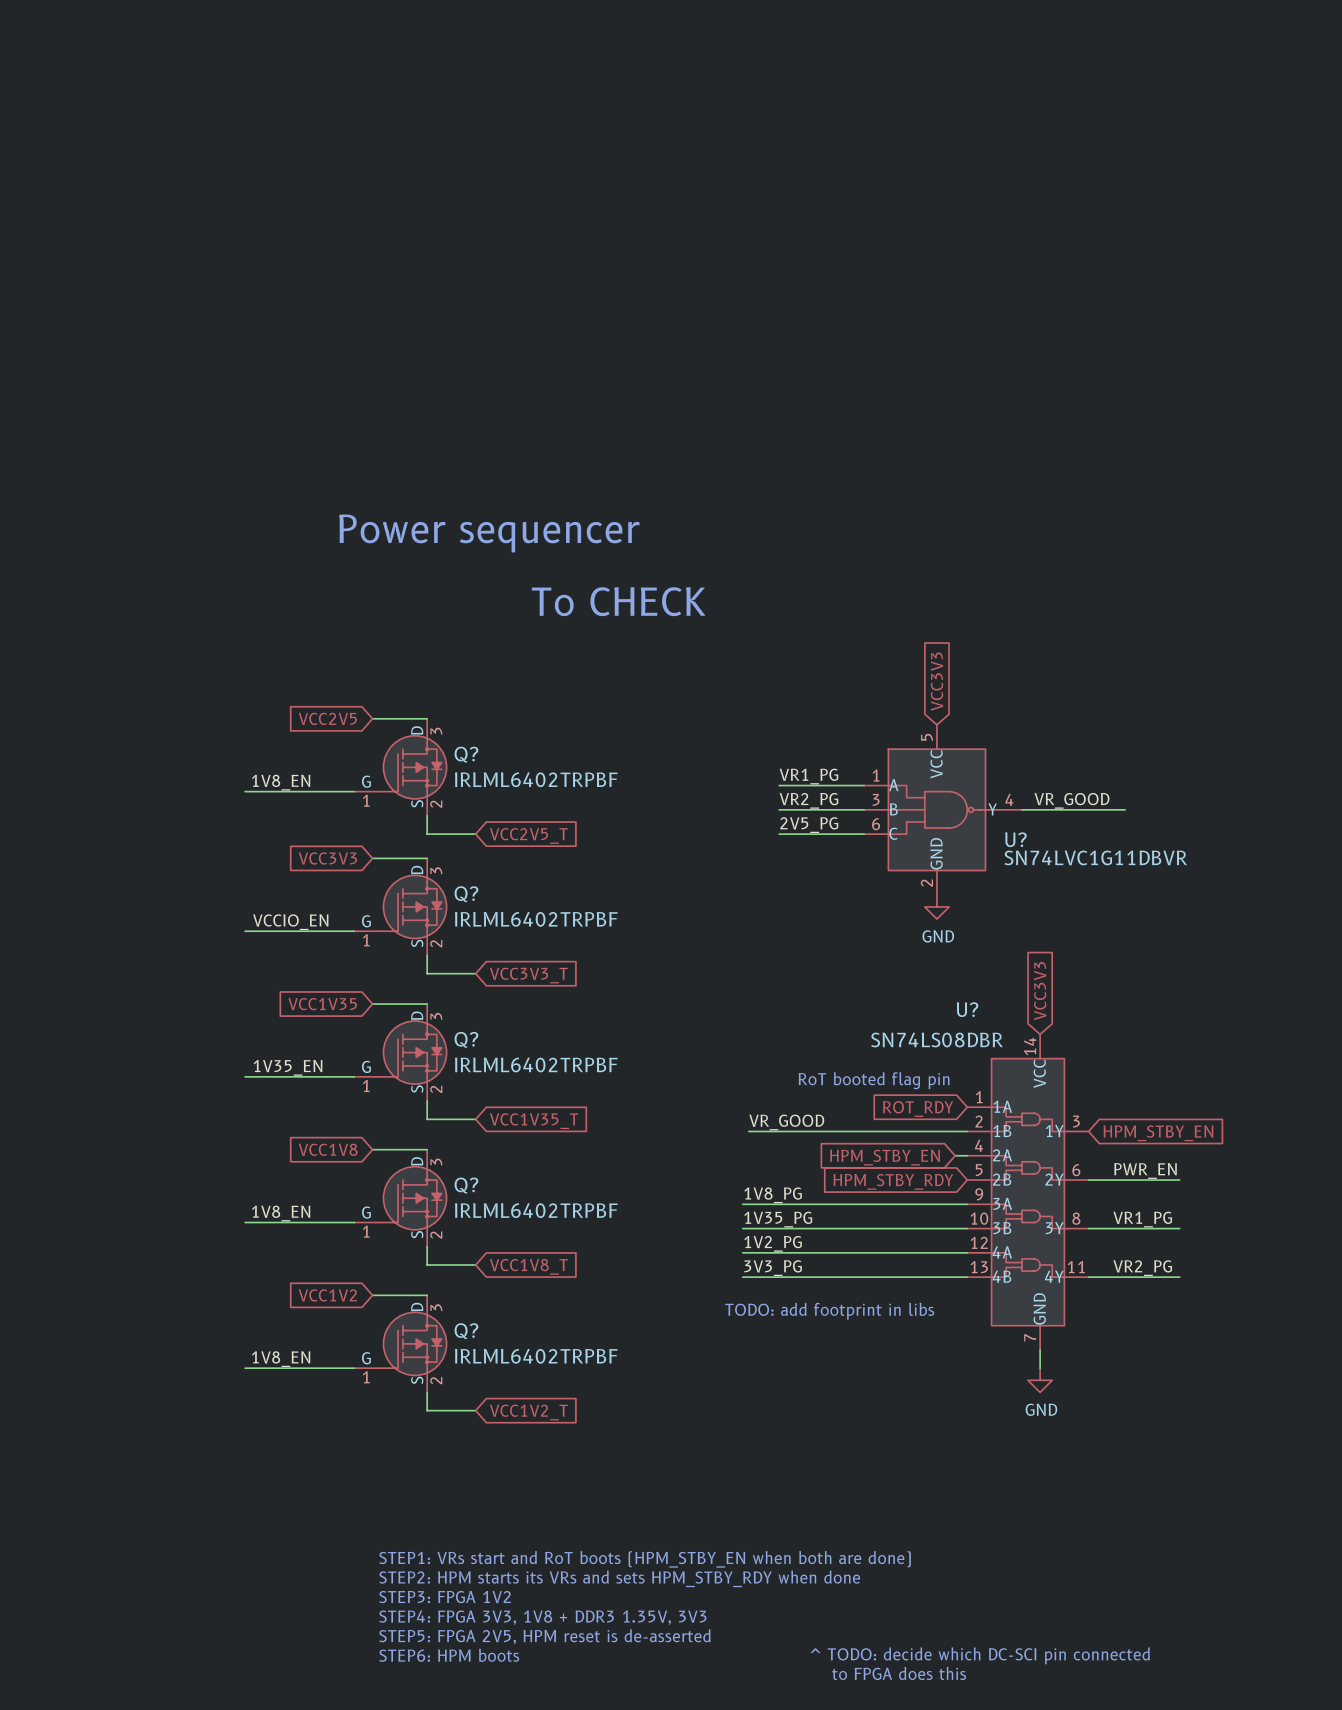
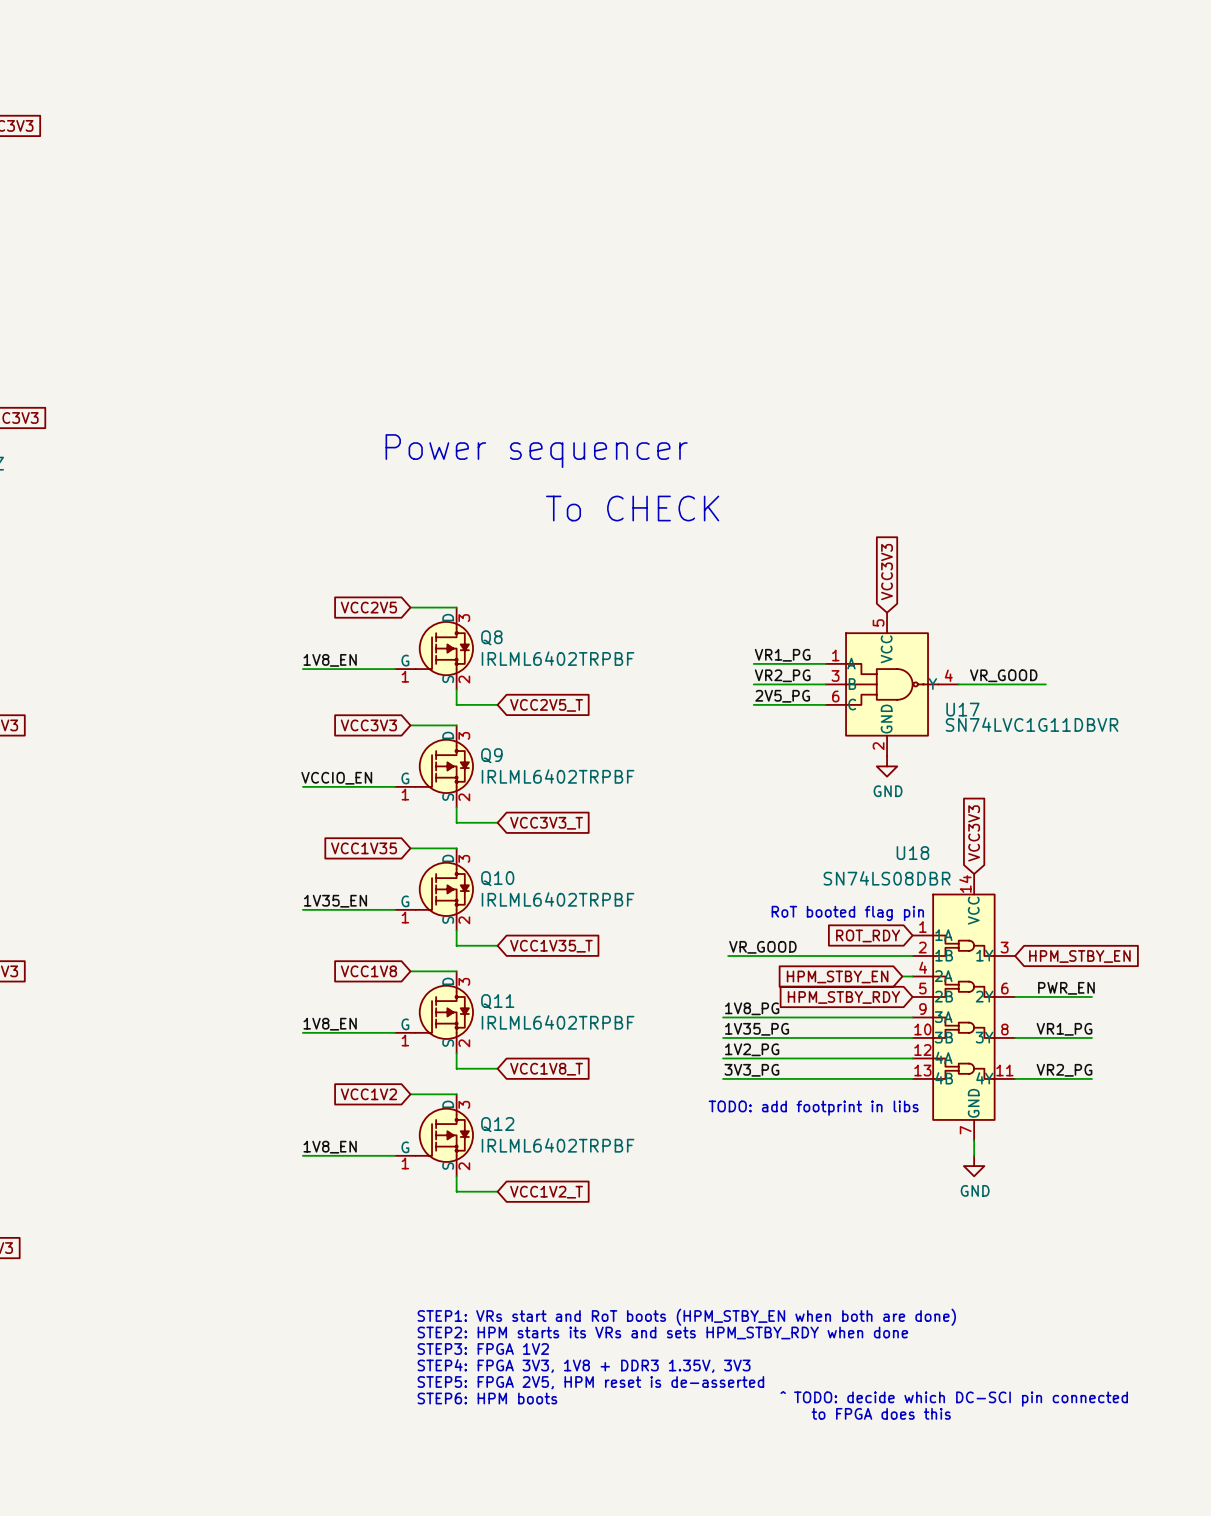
Q? name: Q? (466, 754) -> Q8 (491, 637)
U? name: U? (1015, 839) -> U17 (962, 709)
Q? name: Q? (466, 894) -> Q9 (491, 755)
U? name: U? (967, 1009) -> U18 (912, 853)
Q? name: Q? (466, 1039) -> Q10 (497, 878)
Q? name: Q? (466, 1185) -> Q11 (497, 1001)
Q? name: Q? (466, 1331) -> Q12 (497, 1124)

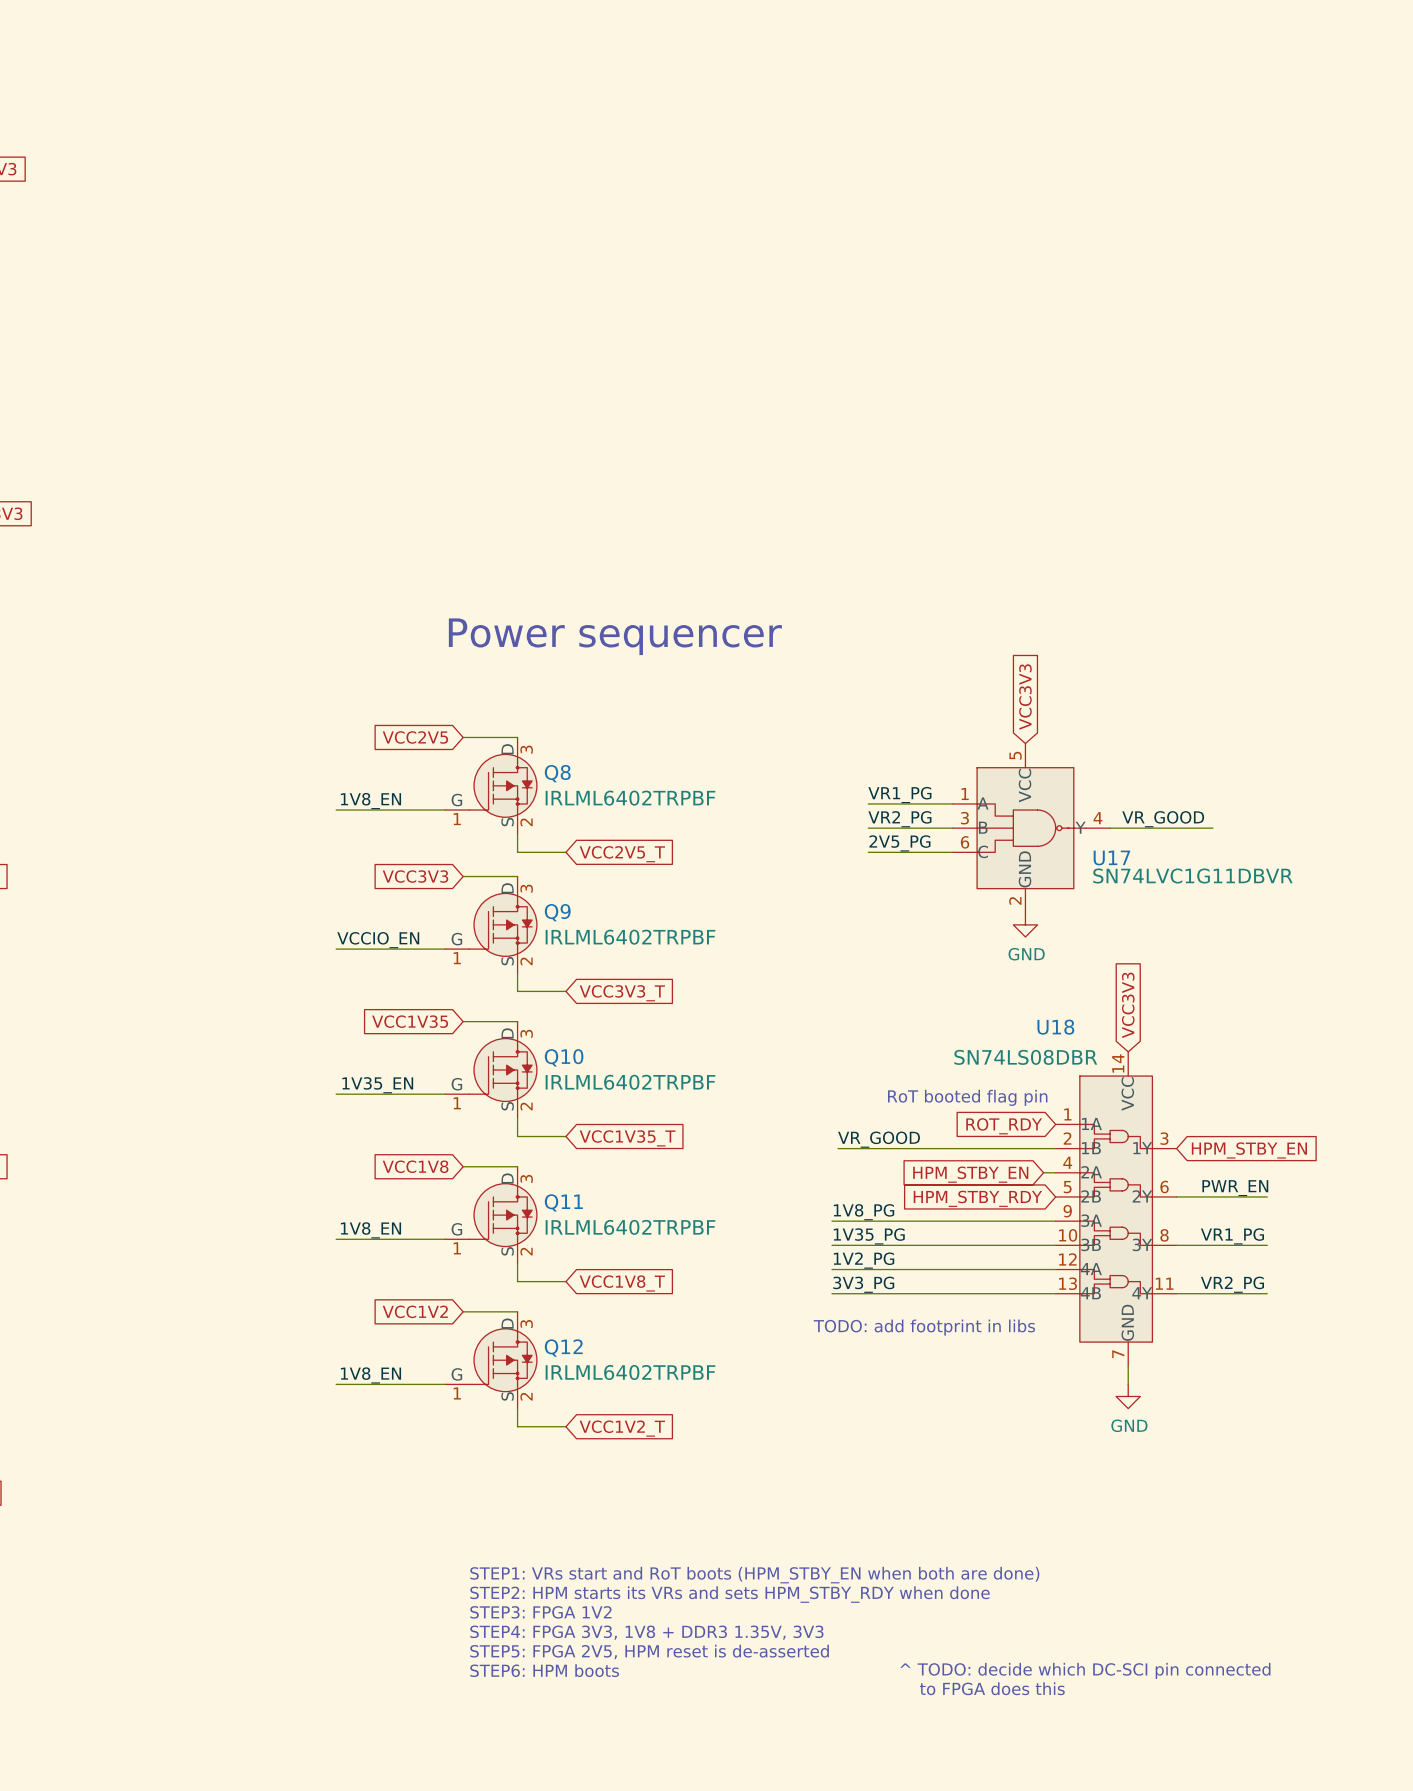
text position: Power sequencer (536, 451) -> Power sequencer (615, 636)
text: To CHECK (632, 508) -> none

